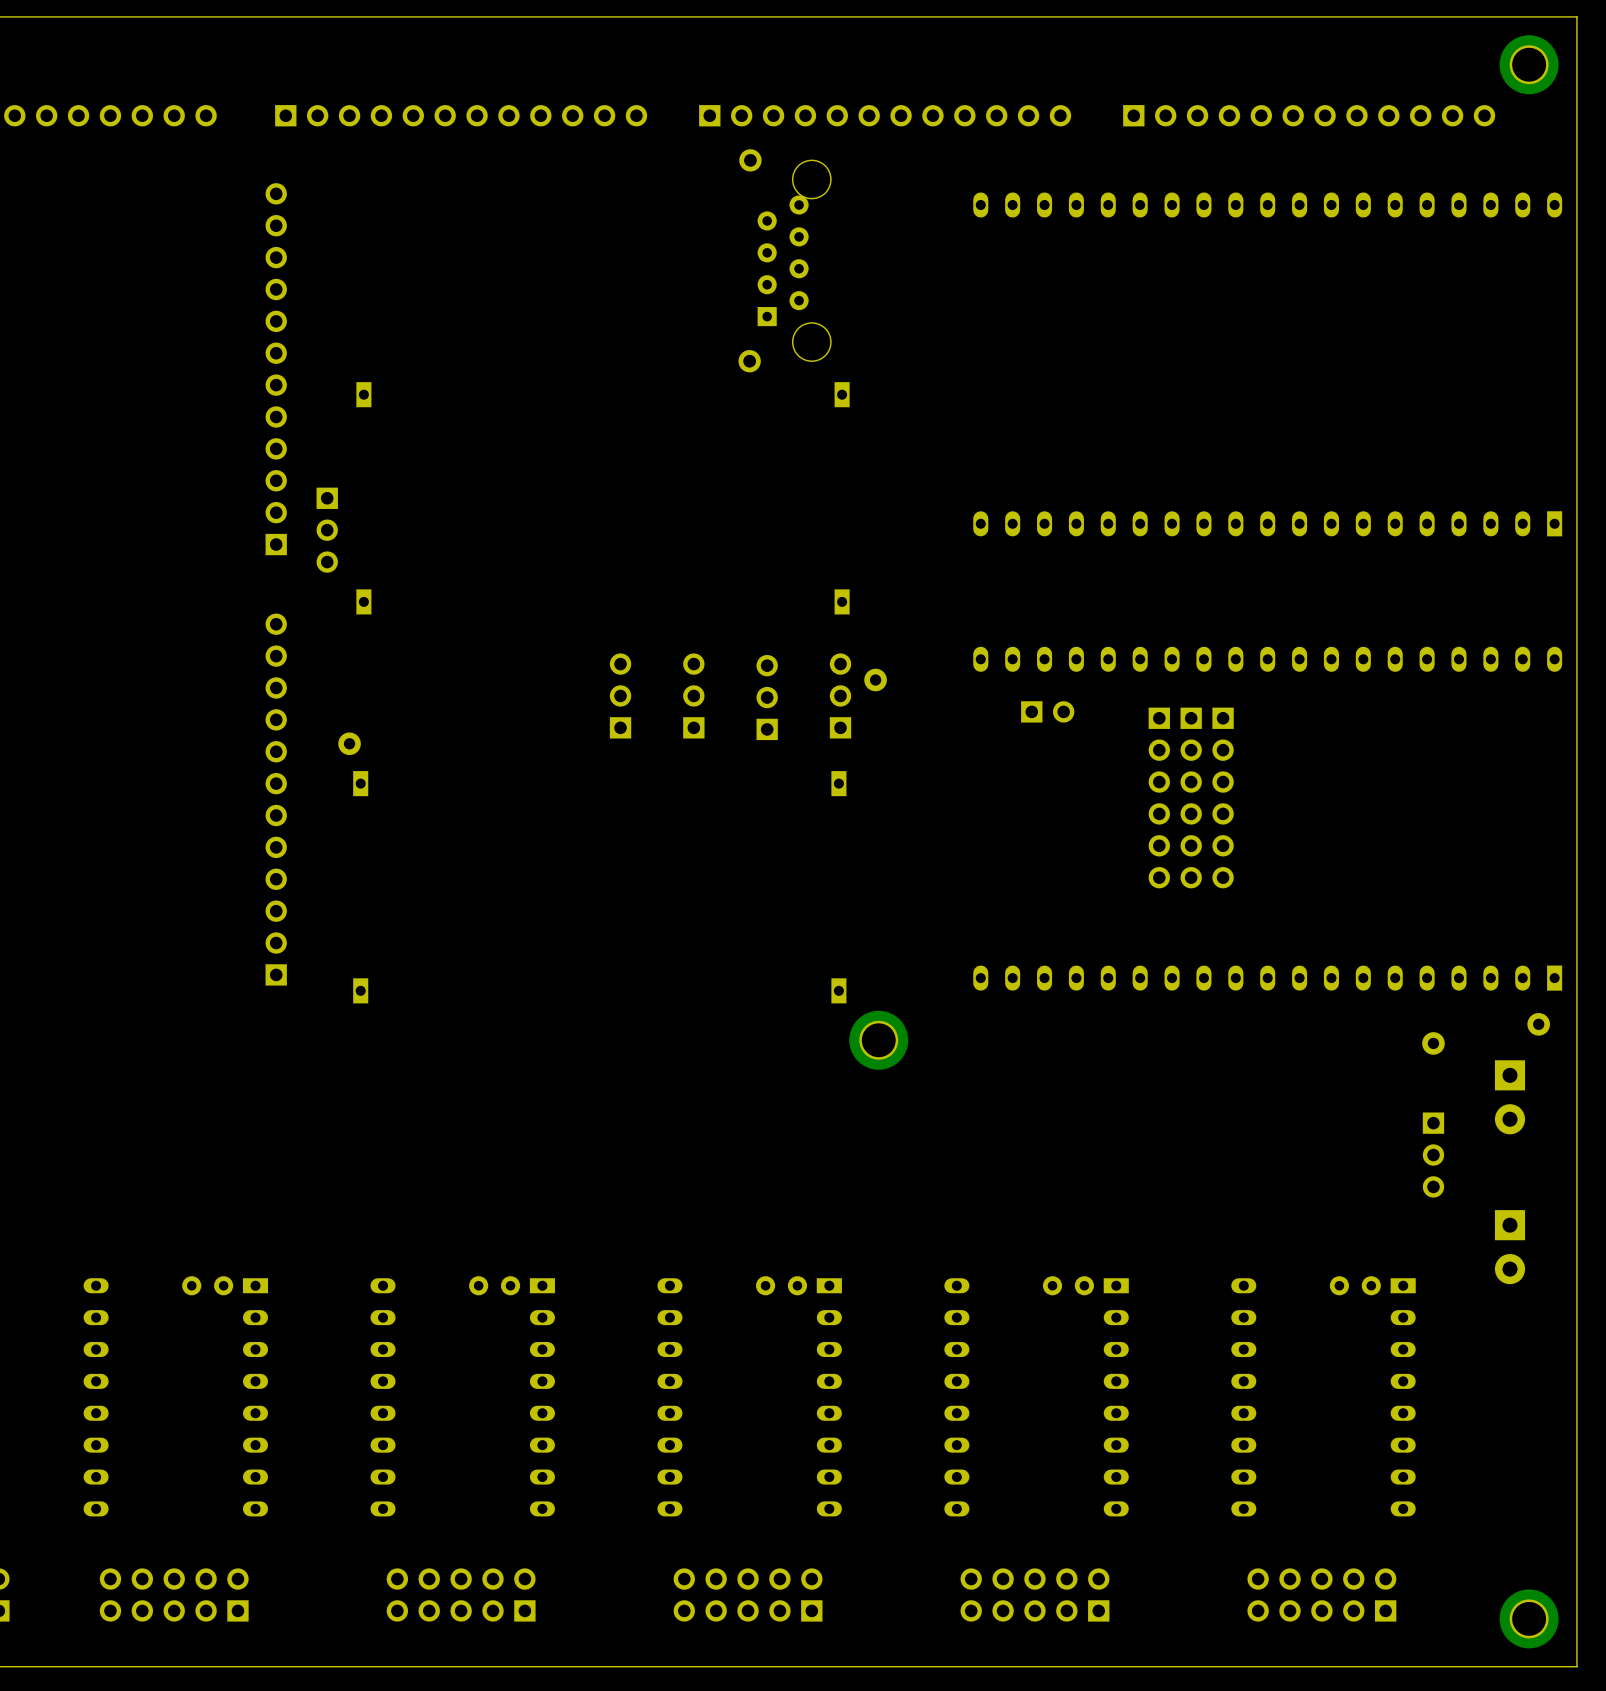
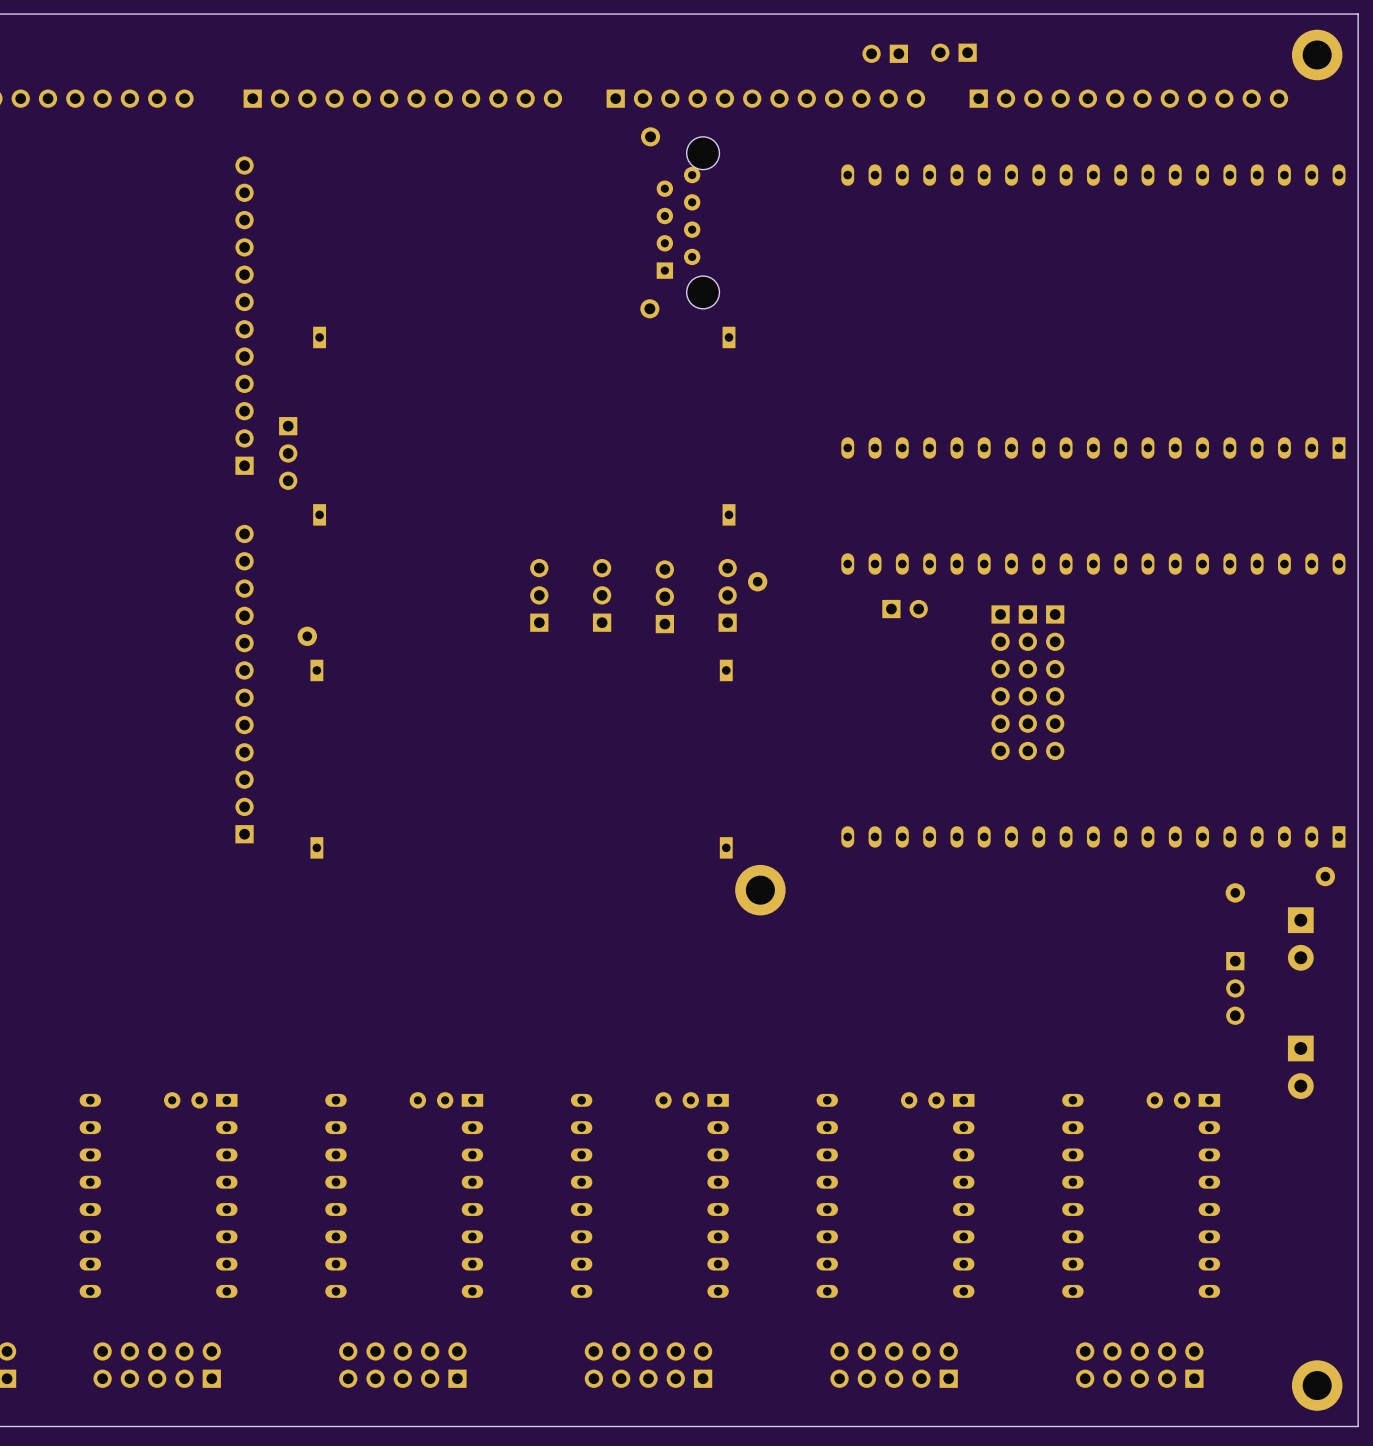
part: none -> (953, 52)
part: none -> (885, 53)

